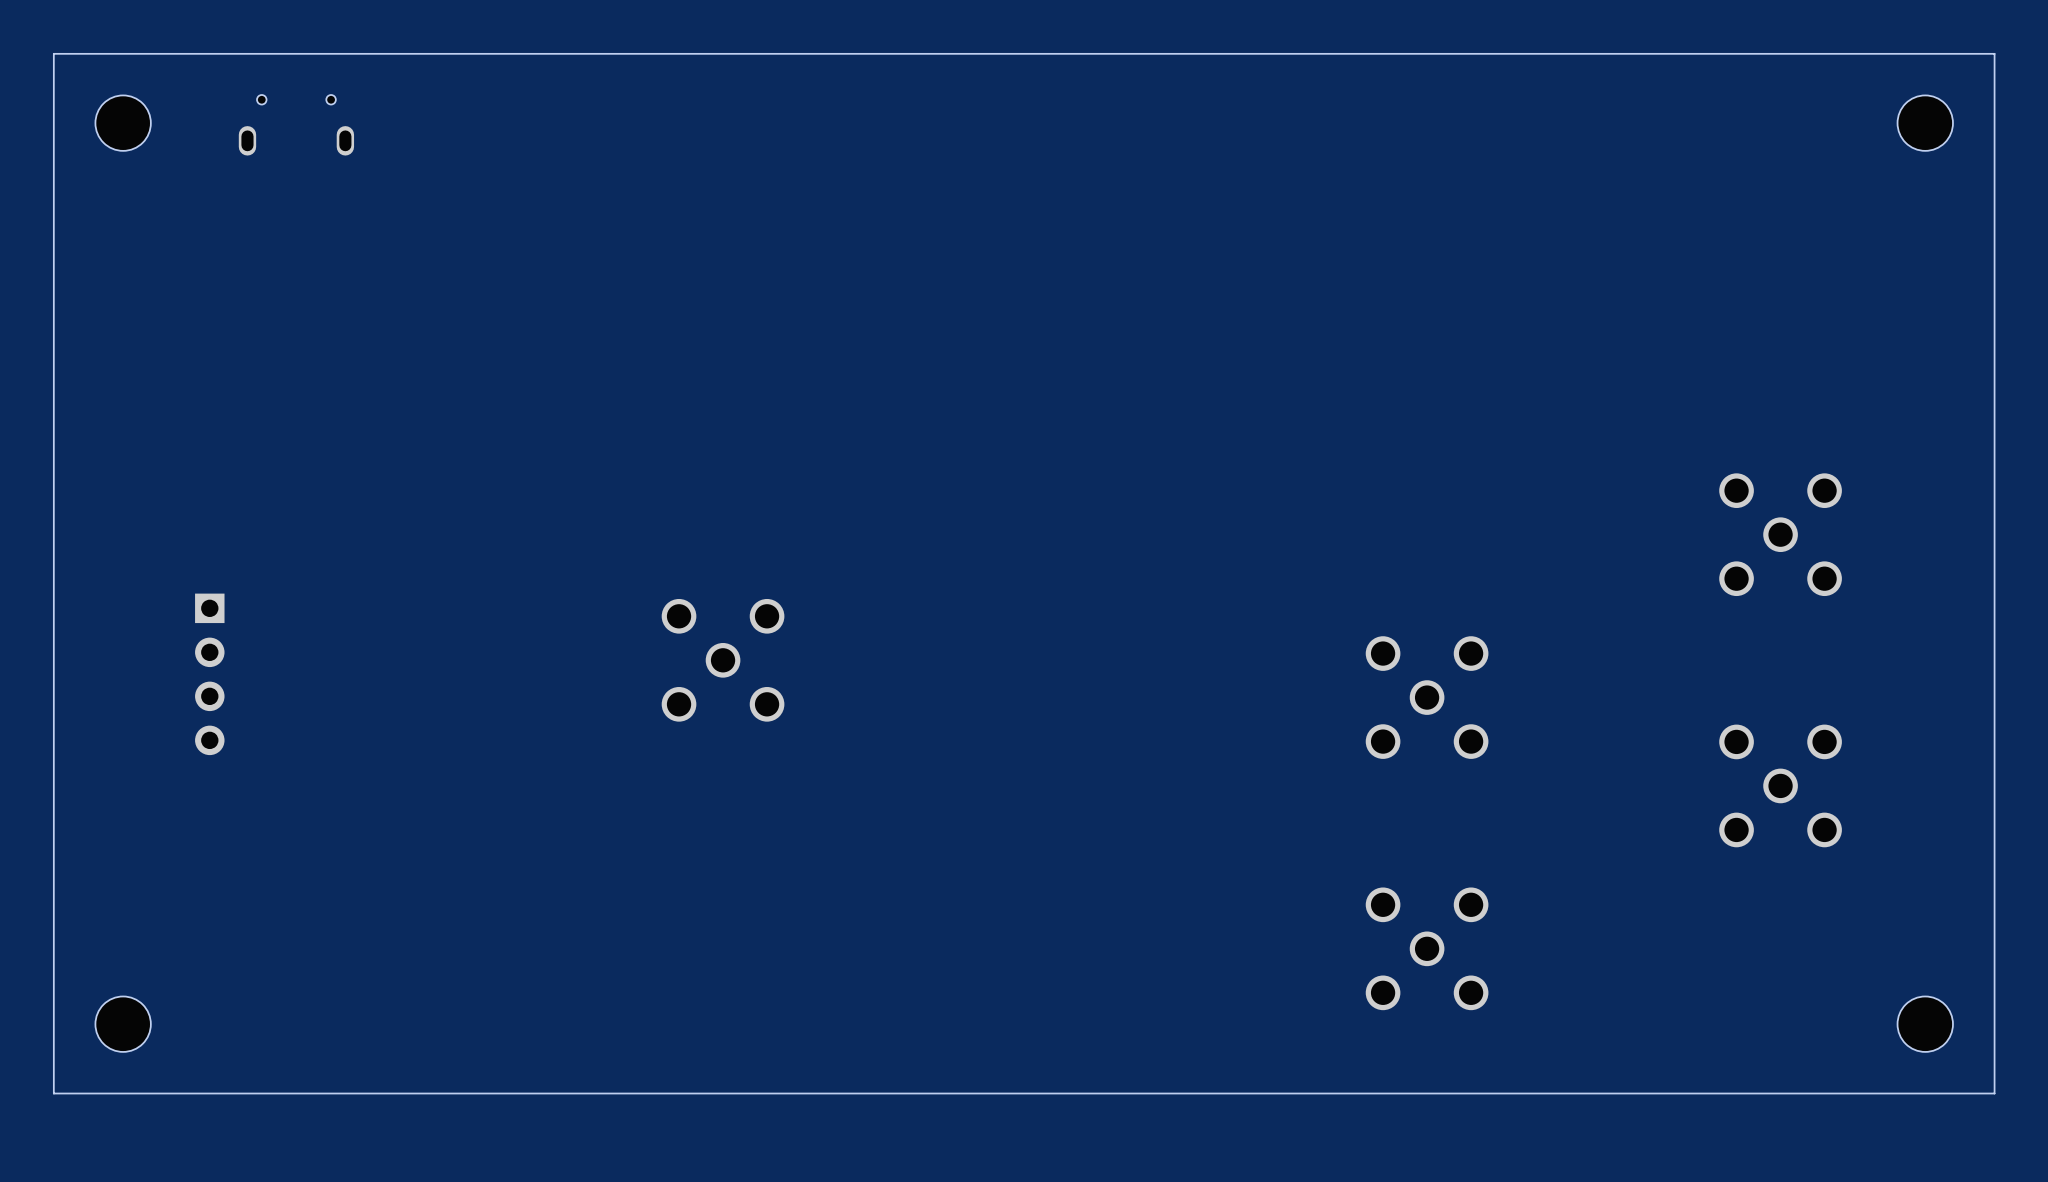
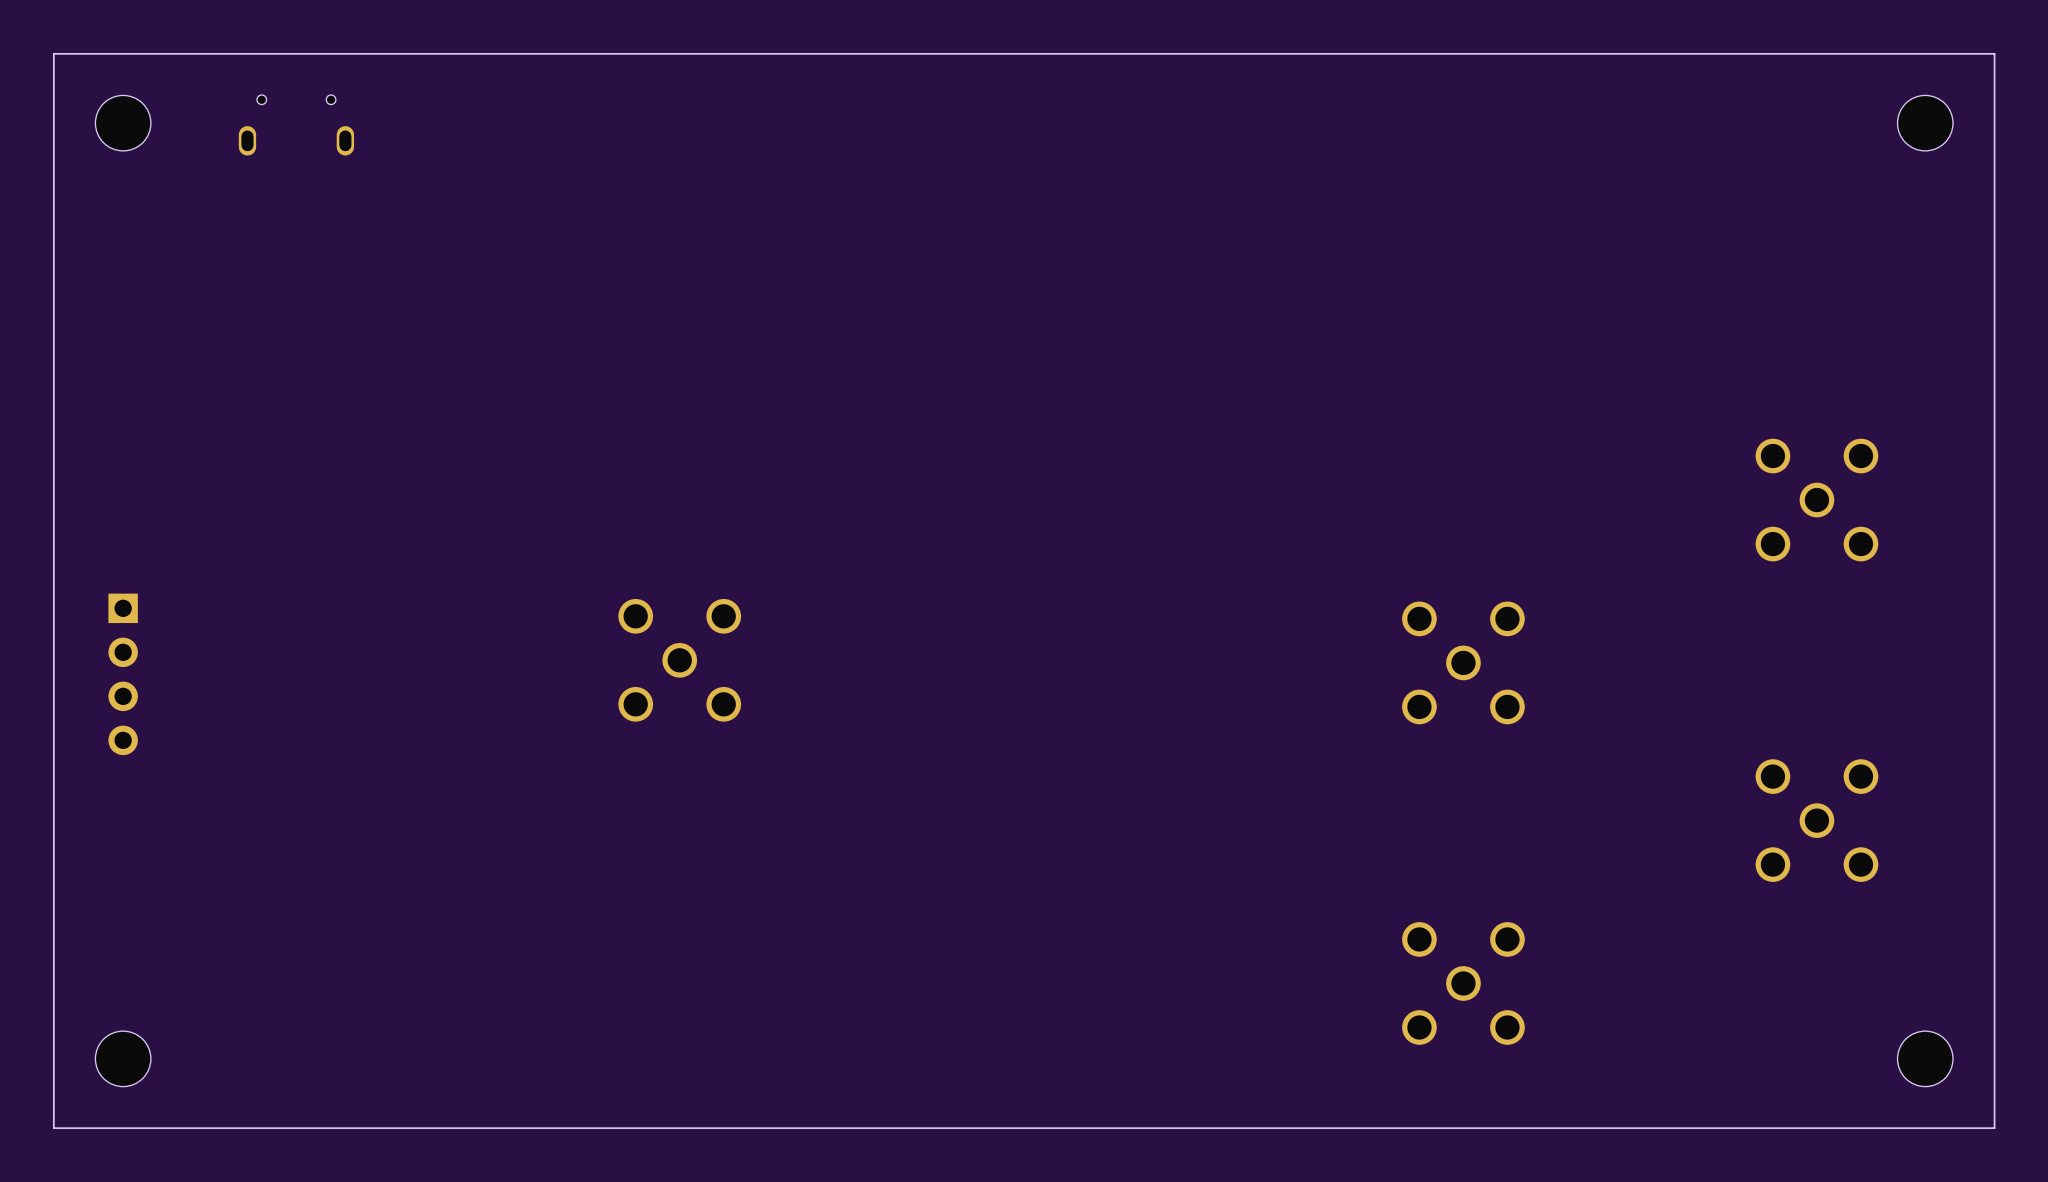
part position: (1780, 534) -> (1816, 500)
part position: (723, 660) -> (679, 660)
part position: (209, 674) -> (123, 674)
part position: (1427, 697) -> (1463, 662)
part position: (1780, 785) -> (1816, 820)
part position: (1427, 948) -> (1463, 983)
part position: (123, 1024) -> (123, 1058)
part position: (1925, 1024) -> (1925, 1058)
board edge: (1994, 1093) (53, 1093) -> (1994, 1093) (1994, 1128) (53, 1128) (53, 1093)

